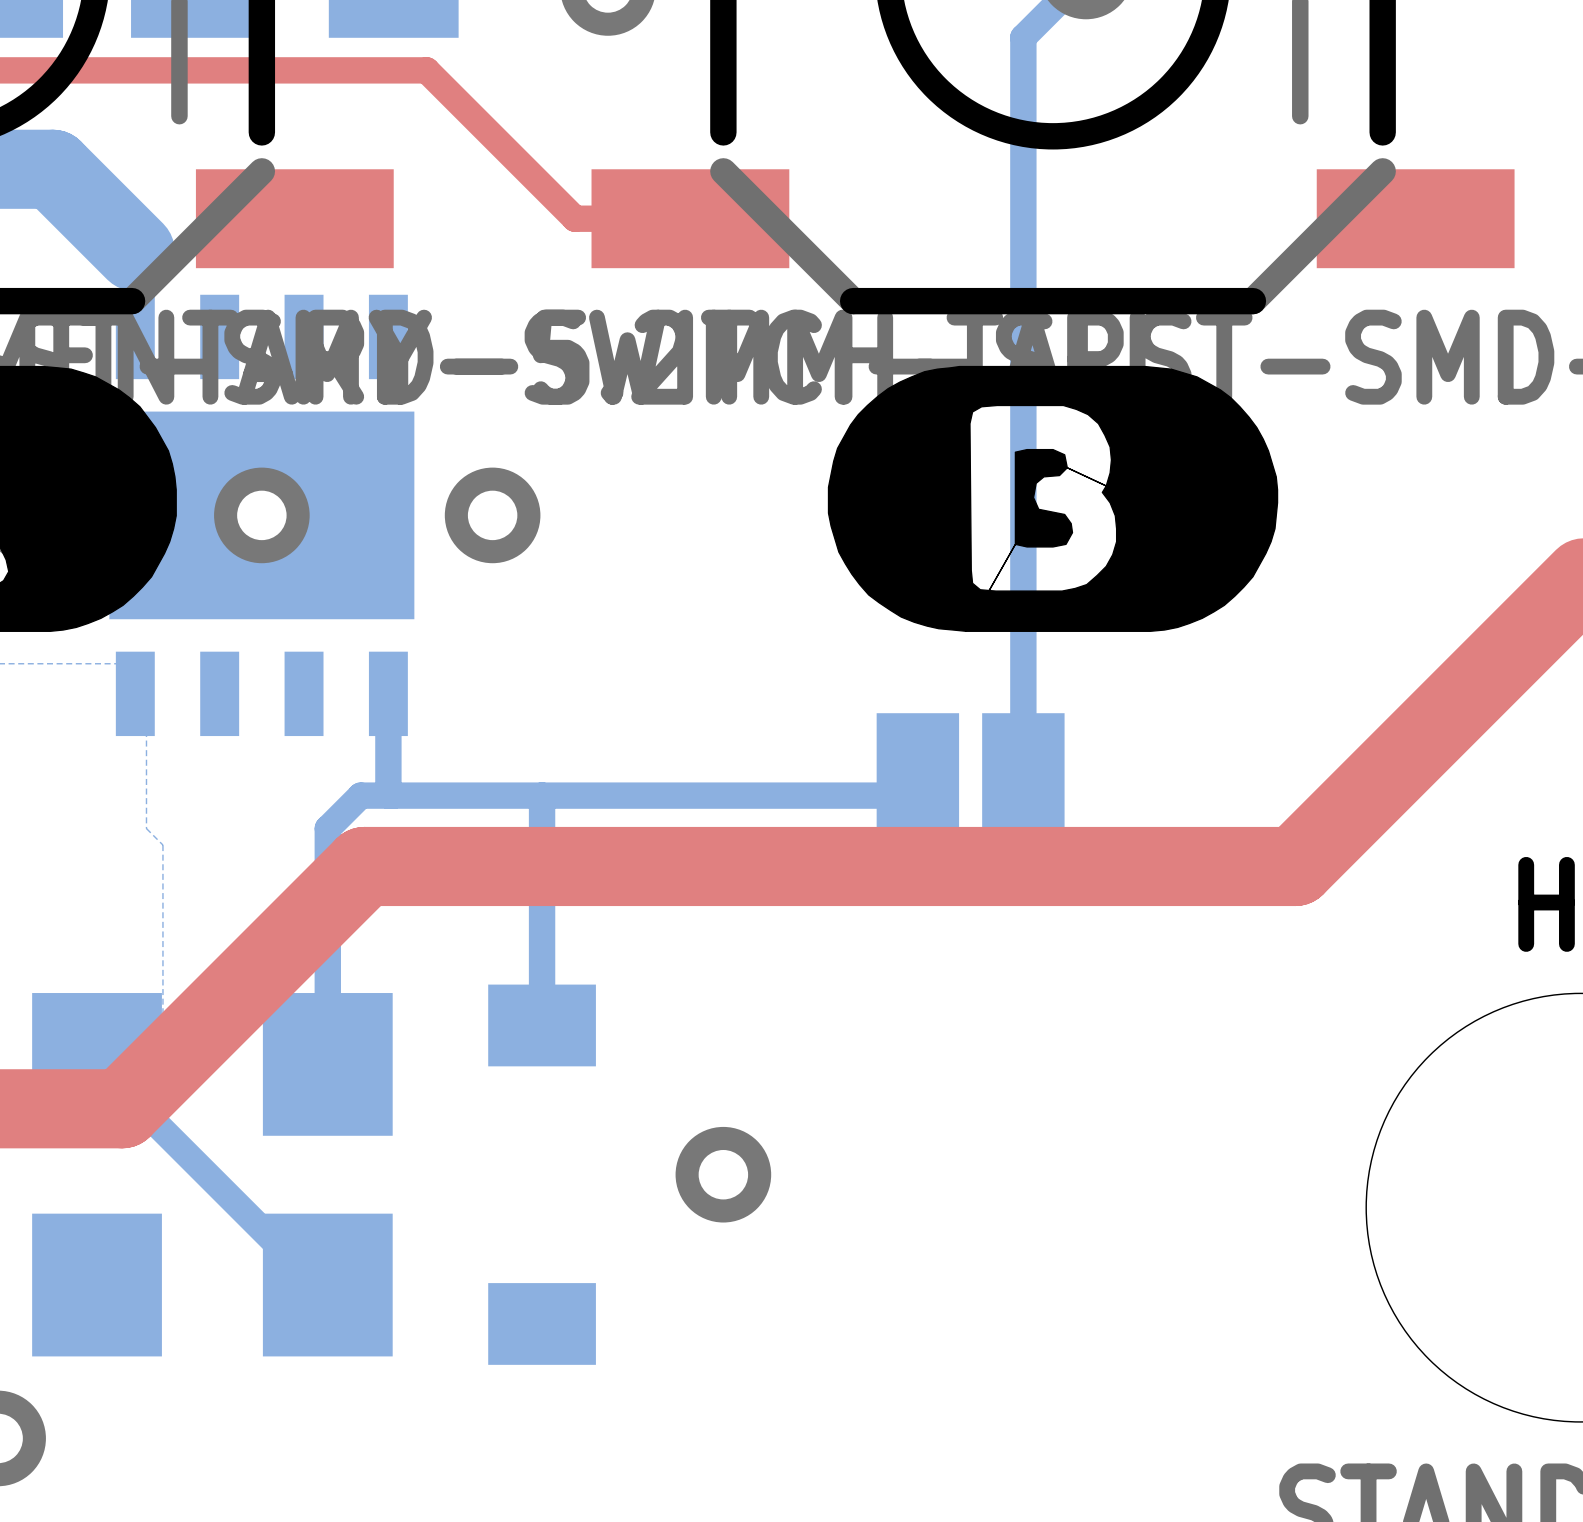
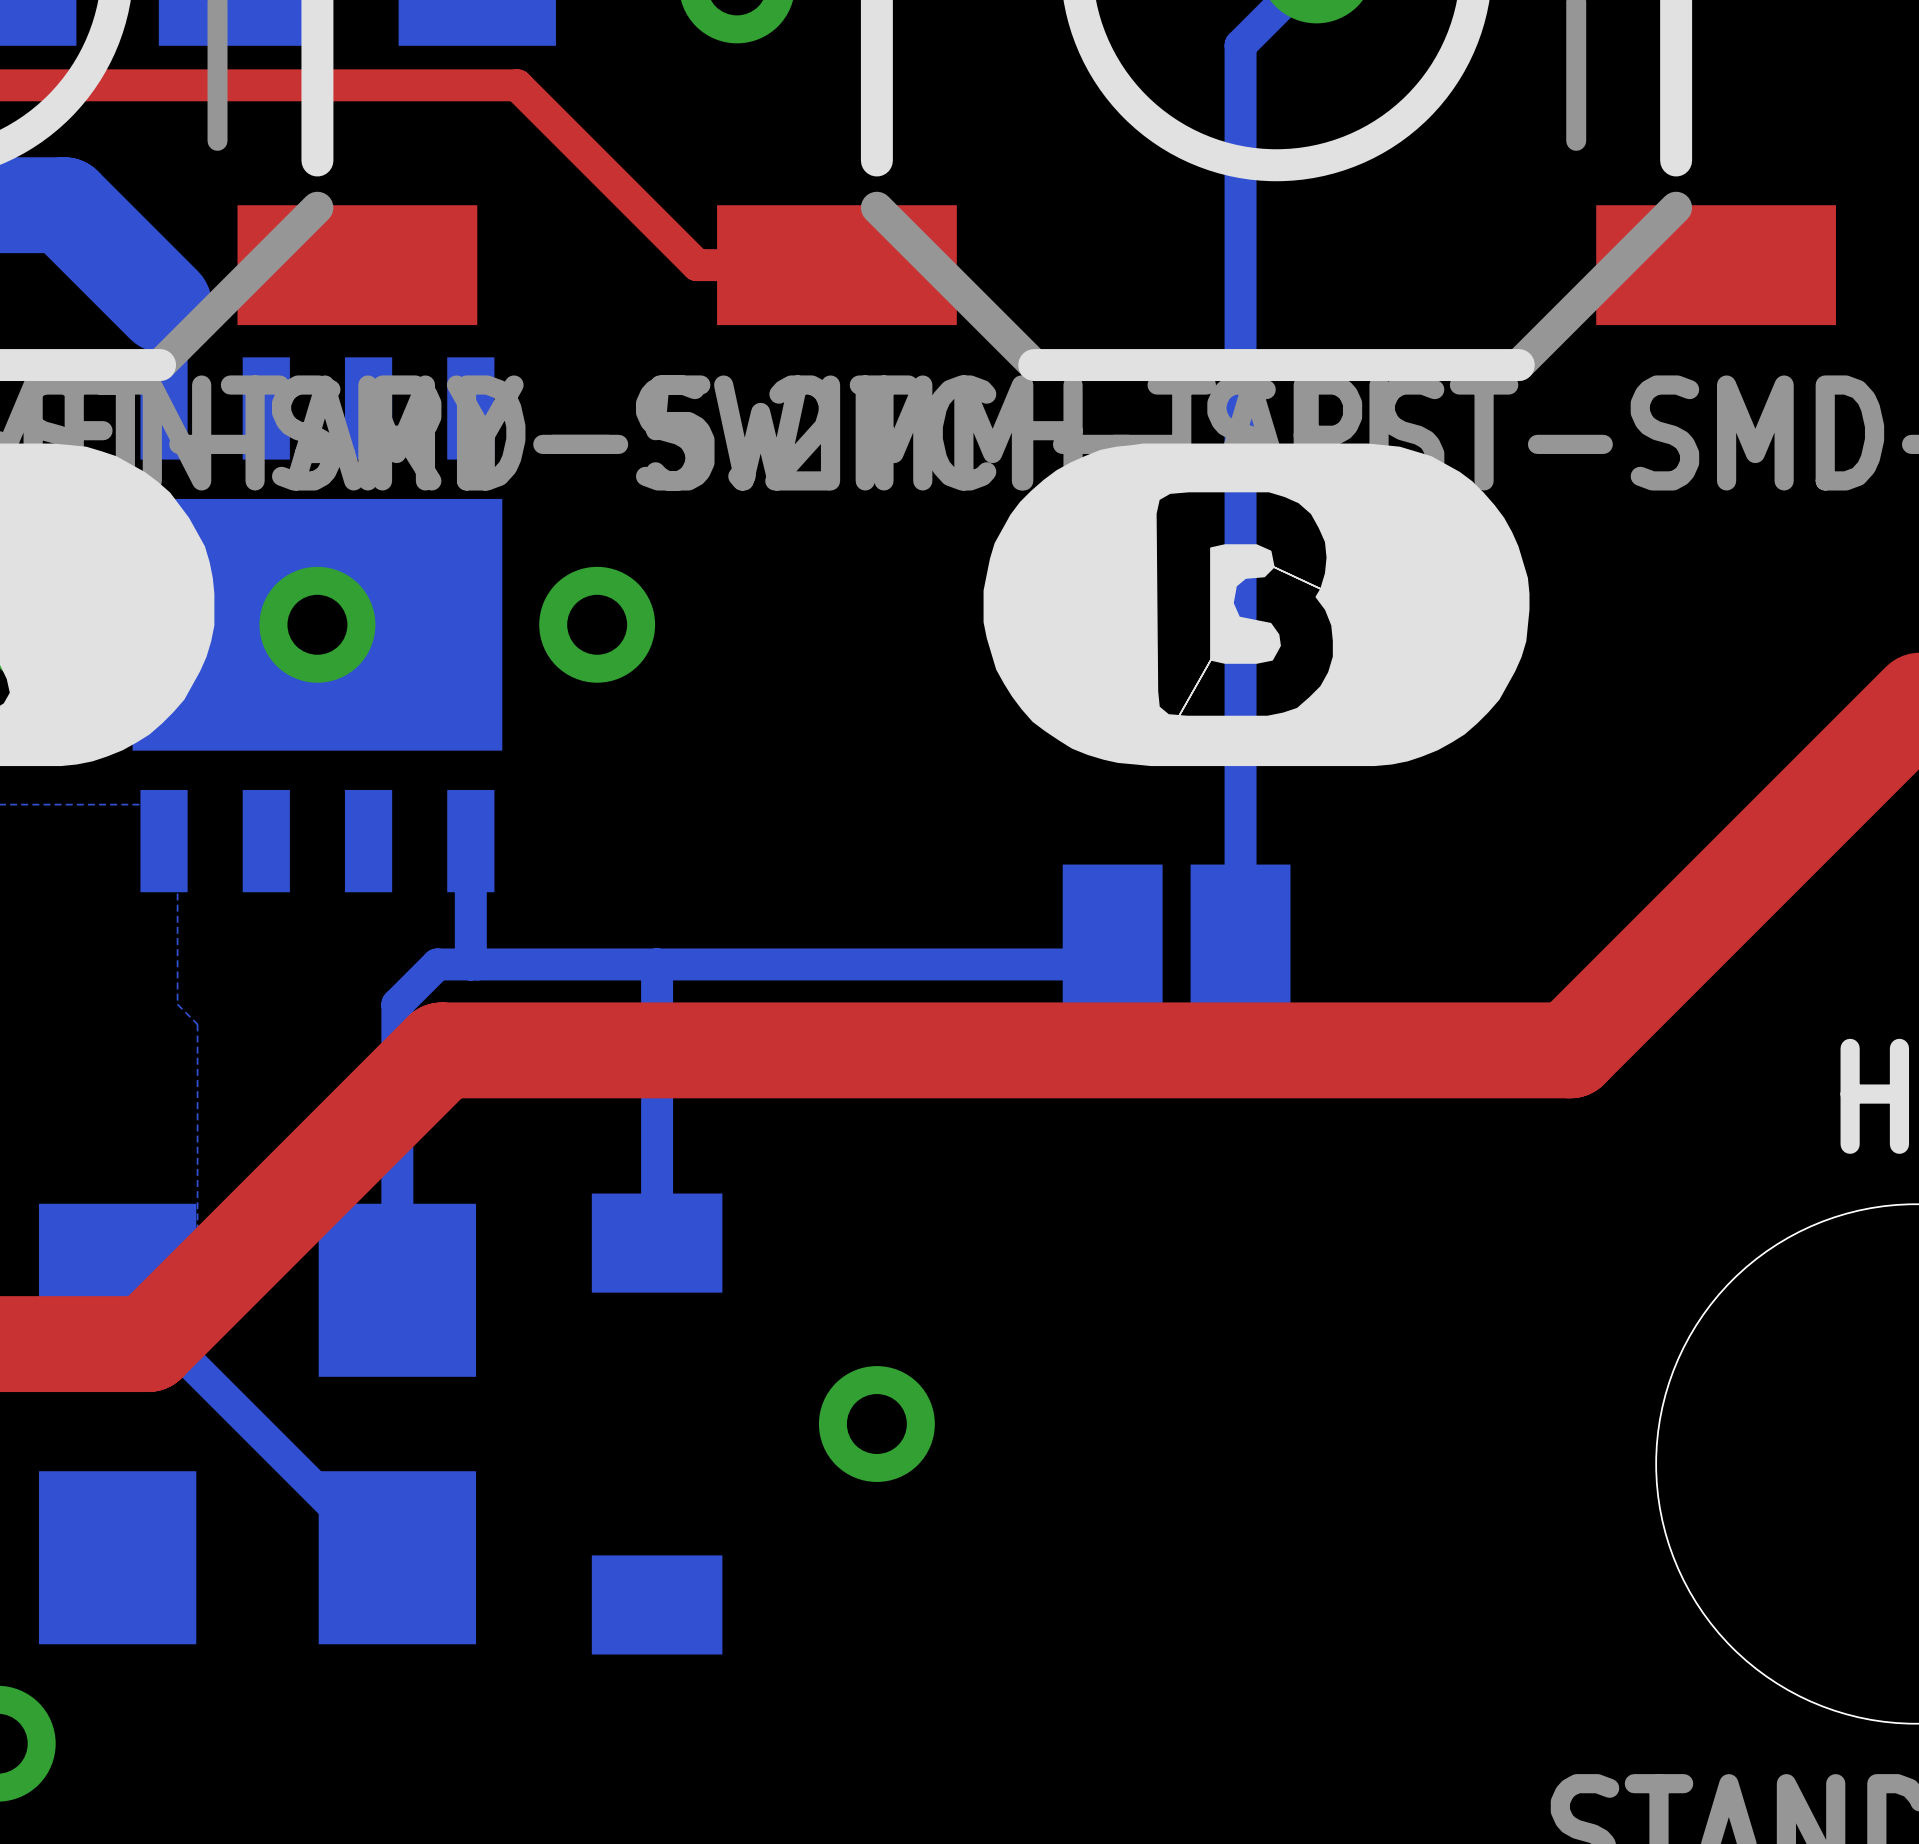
drawing position: (1053, 498) -> (1256, 604)

